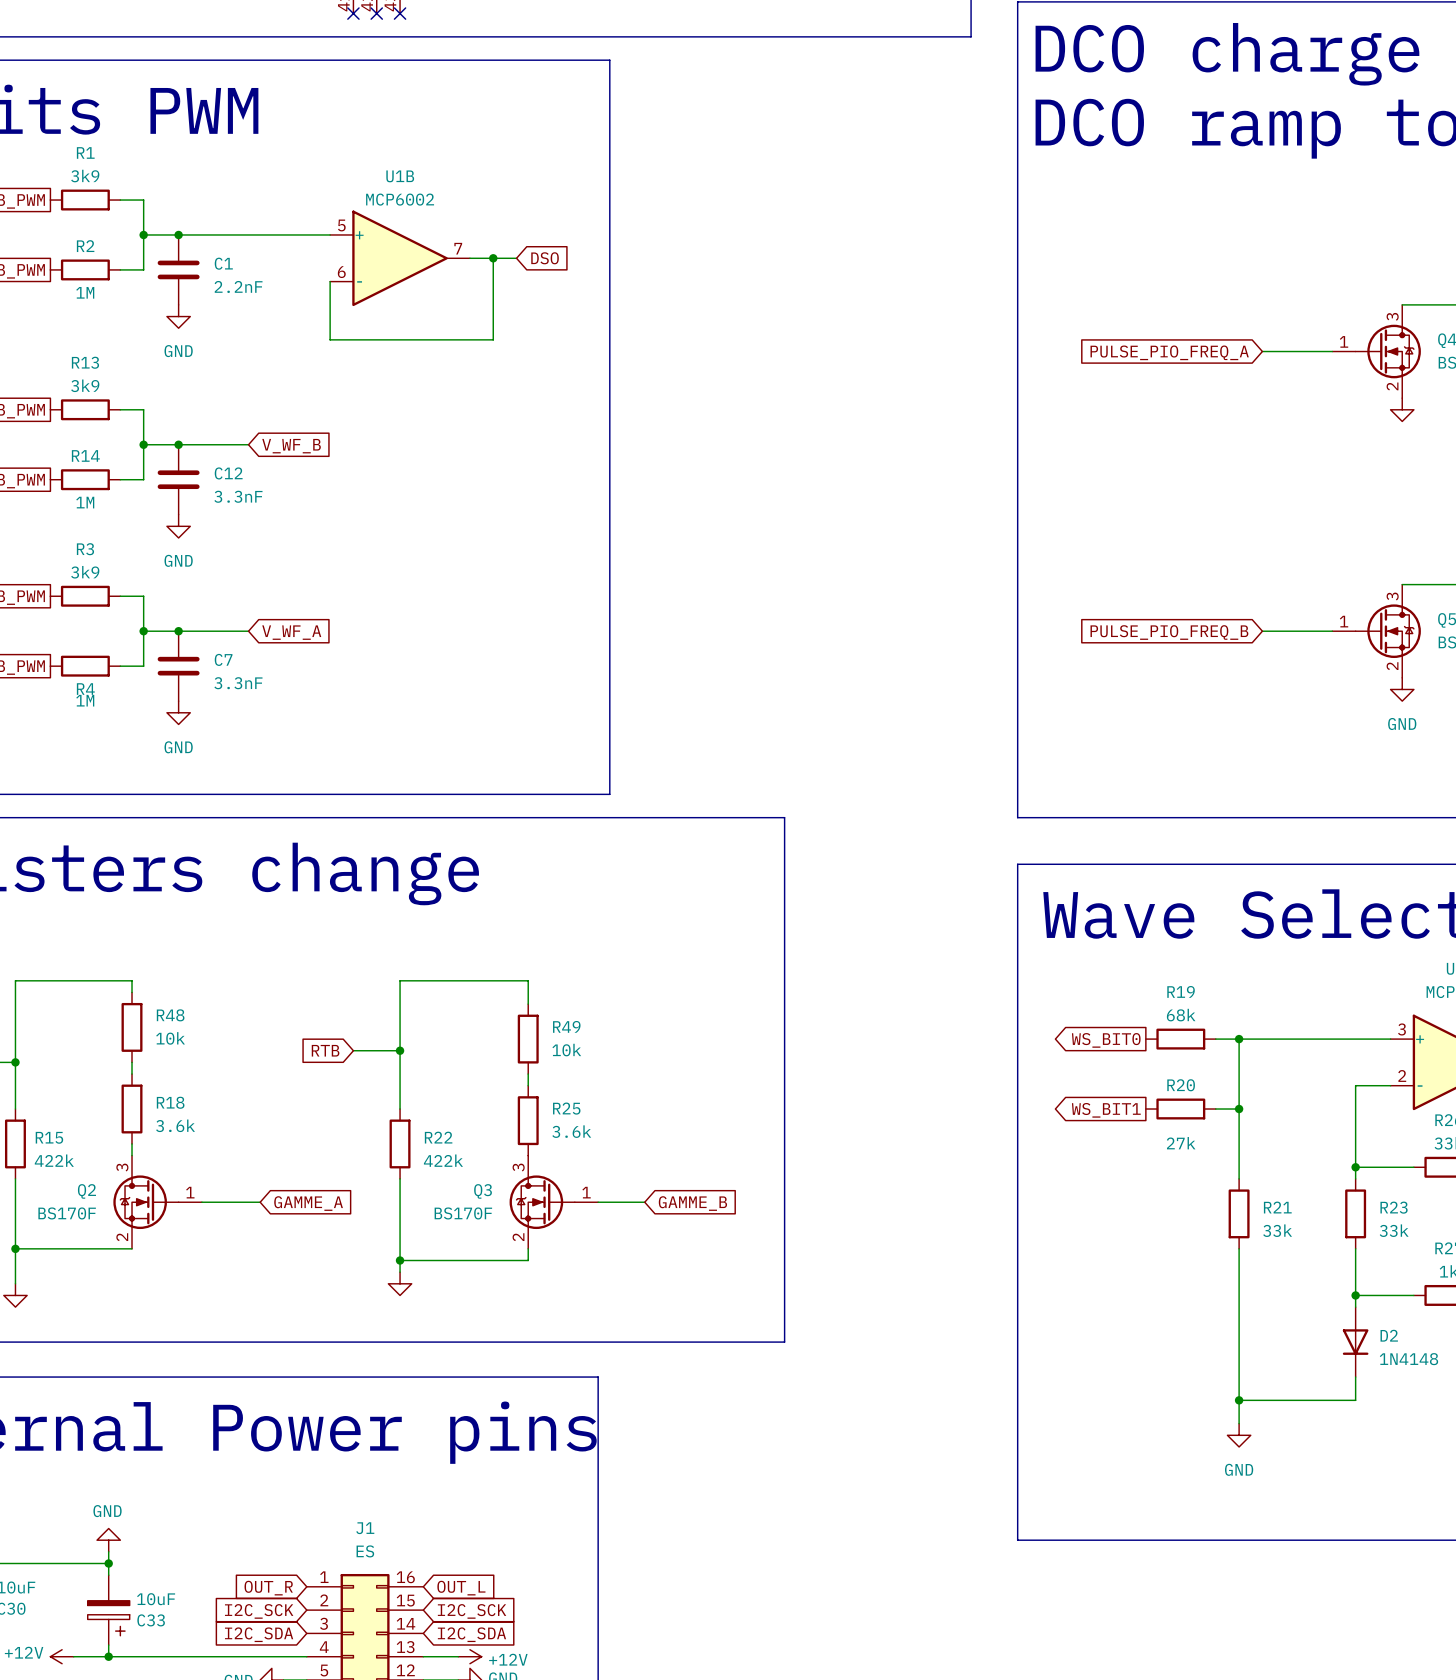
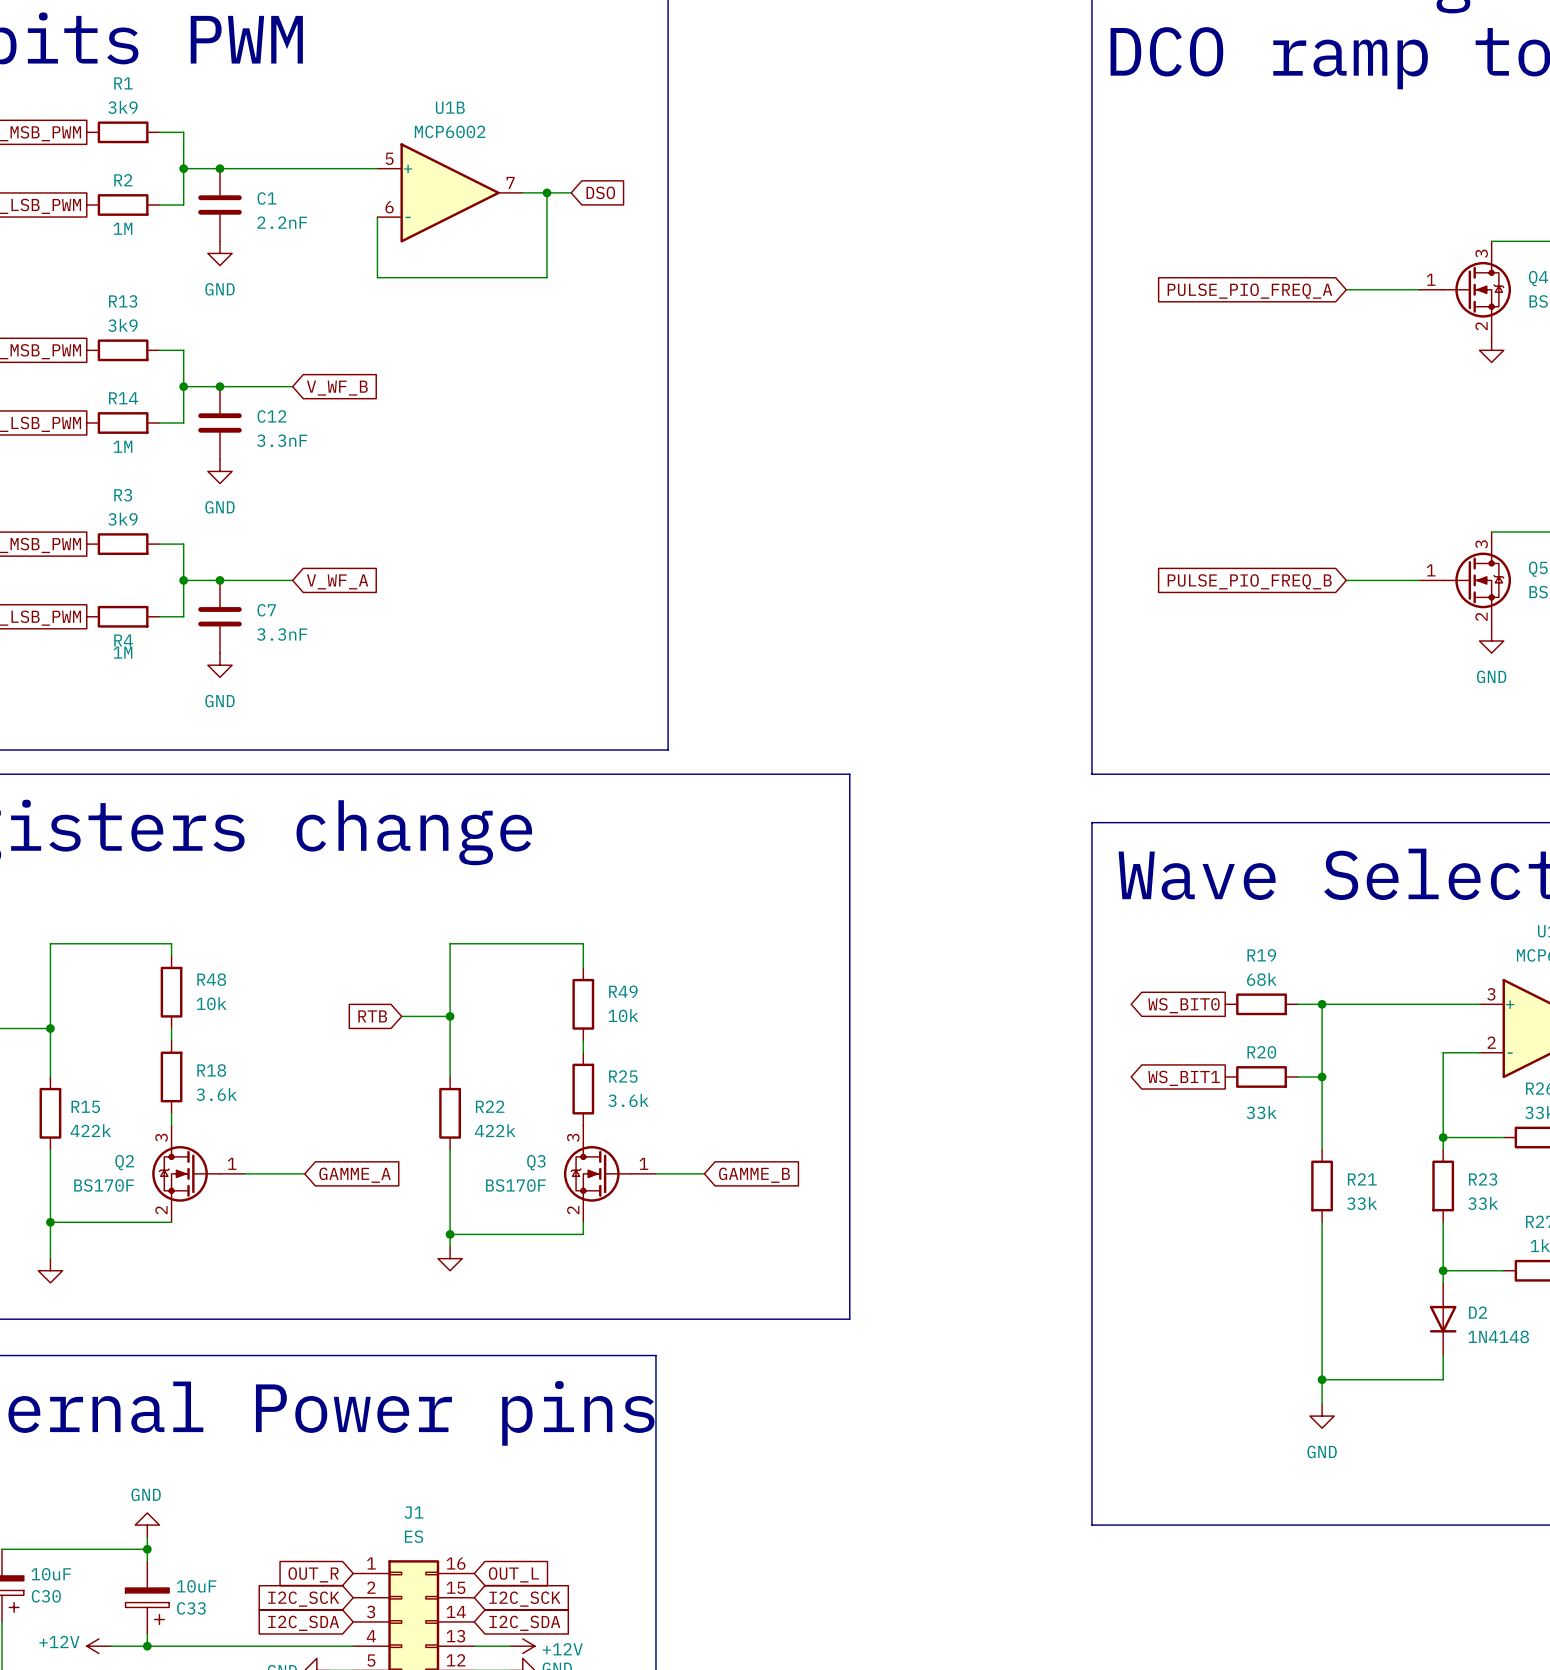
R20 value: 27k (1181, 1143) -> 33k (1261, 1112)

